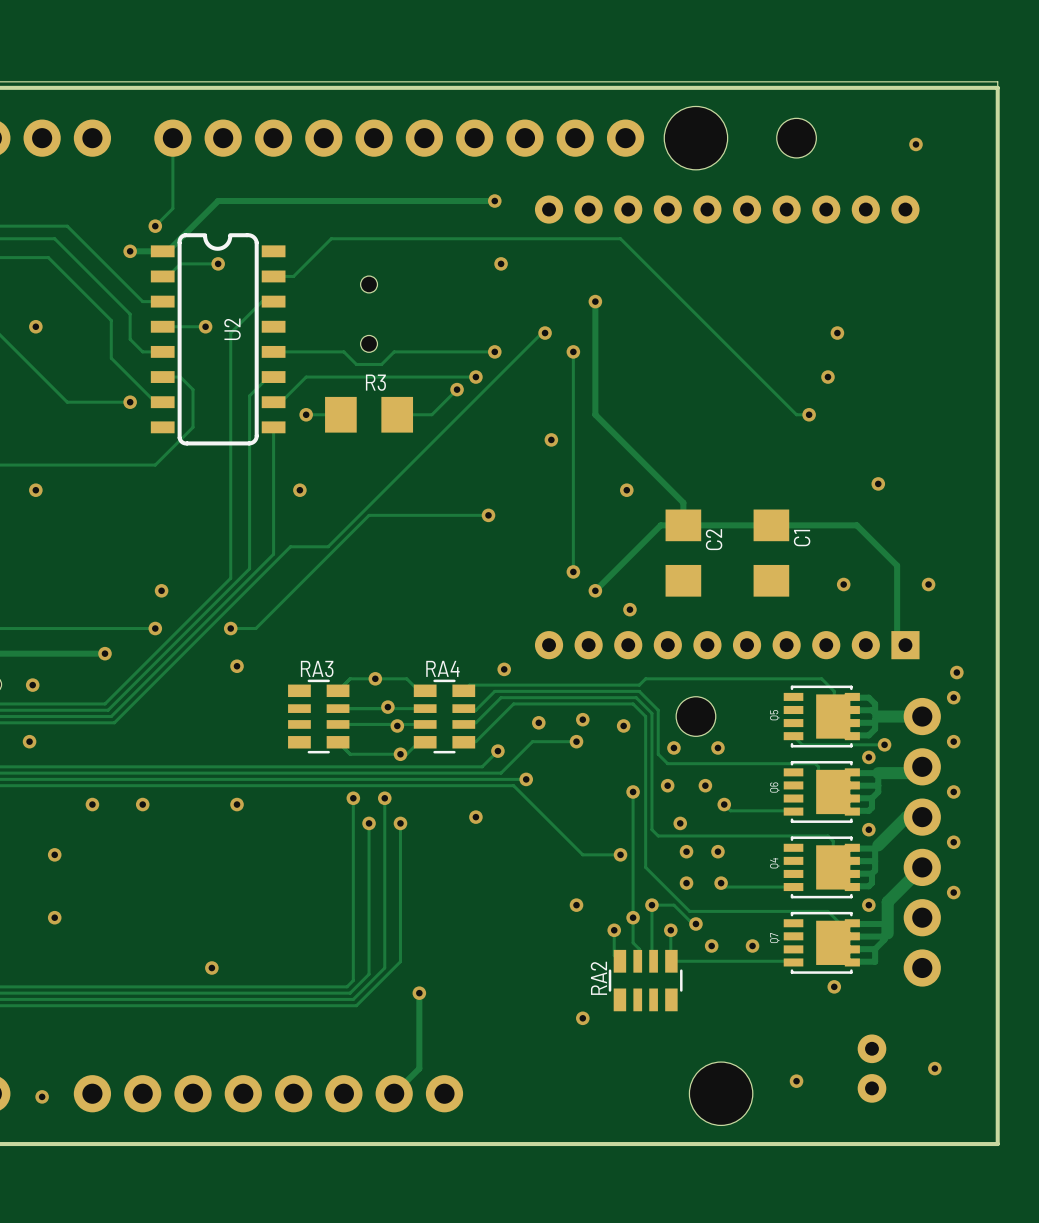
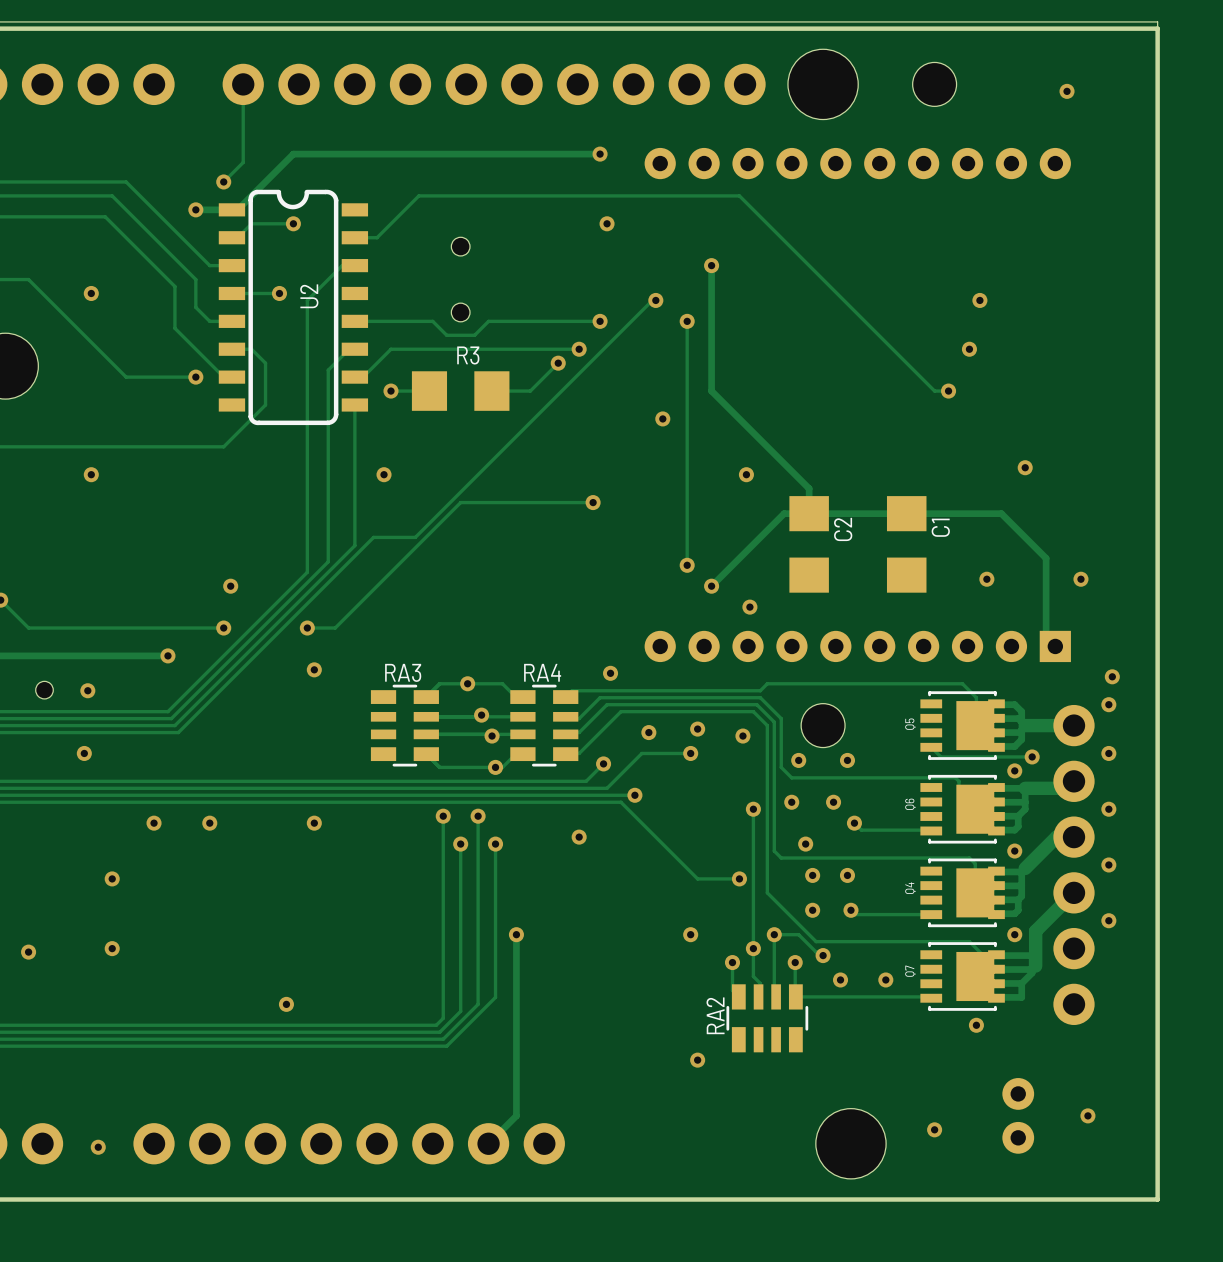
track: none -> (516, 934) (516, 1032)
via position: (419, 993) -> (516, 934)

